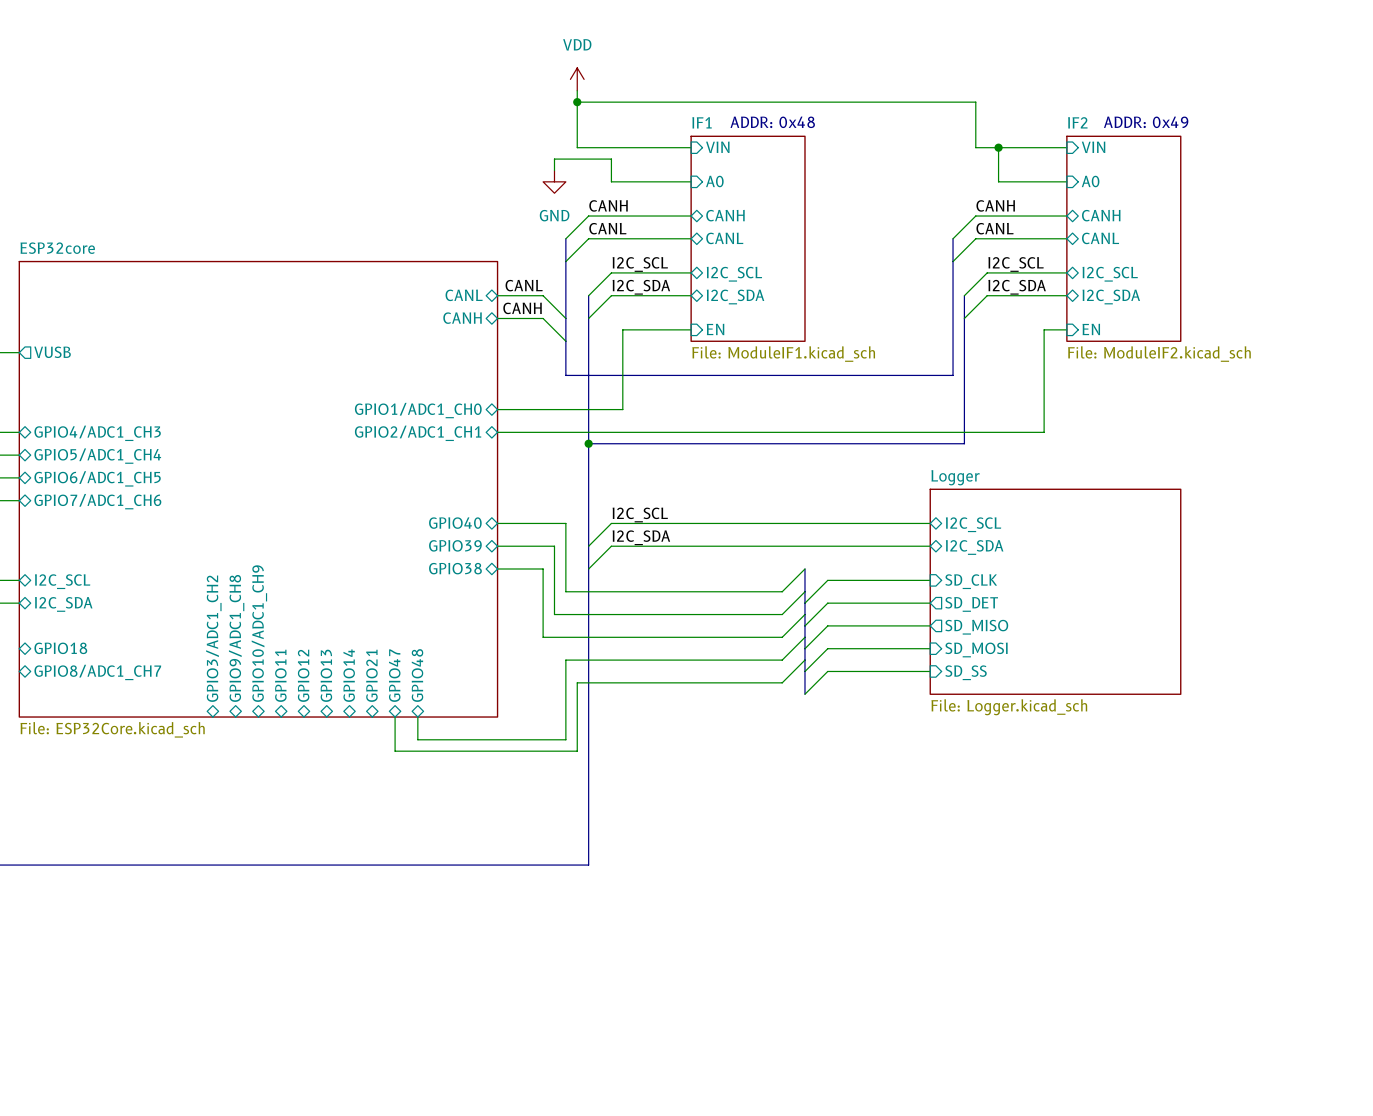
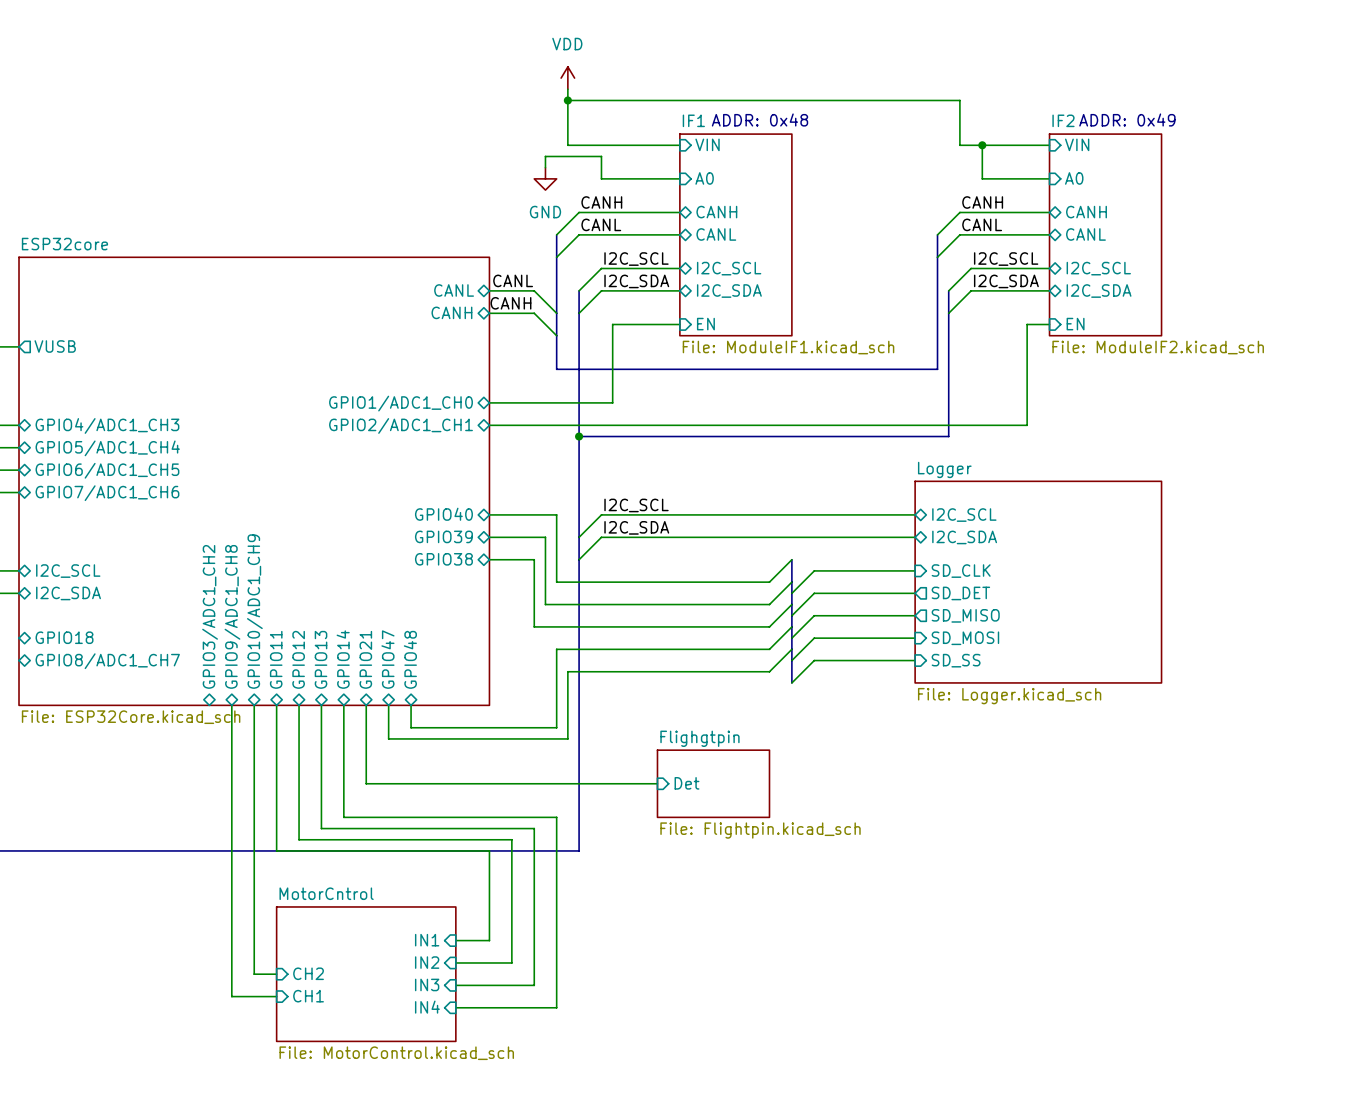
wire: none -> (231, 705) (231, 996) (276, 996)
wire: none -> (254, 705) (254, 974) (276, 974)
wire: none -> (276, 705) (276, 850) (489, 850) (489, 940) (455, 940)
wire: none -> (299, 705) (299, 839) (511, 839) (511, 962) (455, 962)
wire: none -> (321, 705) (321, 828) (534, 828) (534, 985) (455, 985)
wire: none -> (343, 705) (343, 817) (556, 817) (556, 1007) (455, 1007)
wire: none -> (366, 705) (366, 783) (657, 783)
sheet pin: none -> Det (686, 783)
sheet Flighgtpin: none -> File: Flightpin.kicad_sch (713, 783)
sheet pin: none -> IN1 (427, 940)
sheet pin: none -> IN2 (427, 962)
sheet pin: none -> CH2 (308, 973)
sheet MotorCntrol: none -> File: MotorControl.kicad_sch (366, 974)
sheet pin: none -> IN3 (427, 984)
sheet pin: none -> CH1 (308, 996)
sheet pin: none -> IN4 (427, 1007)

